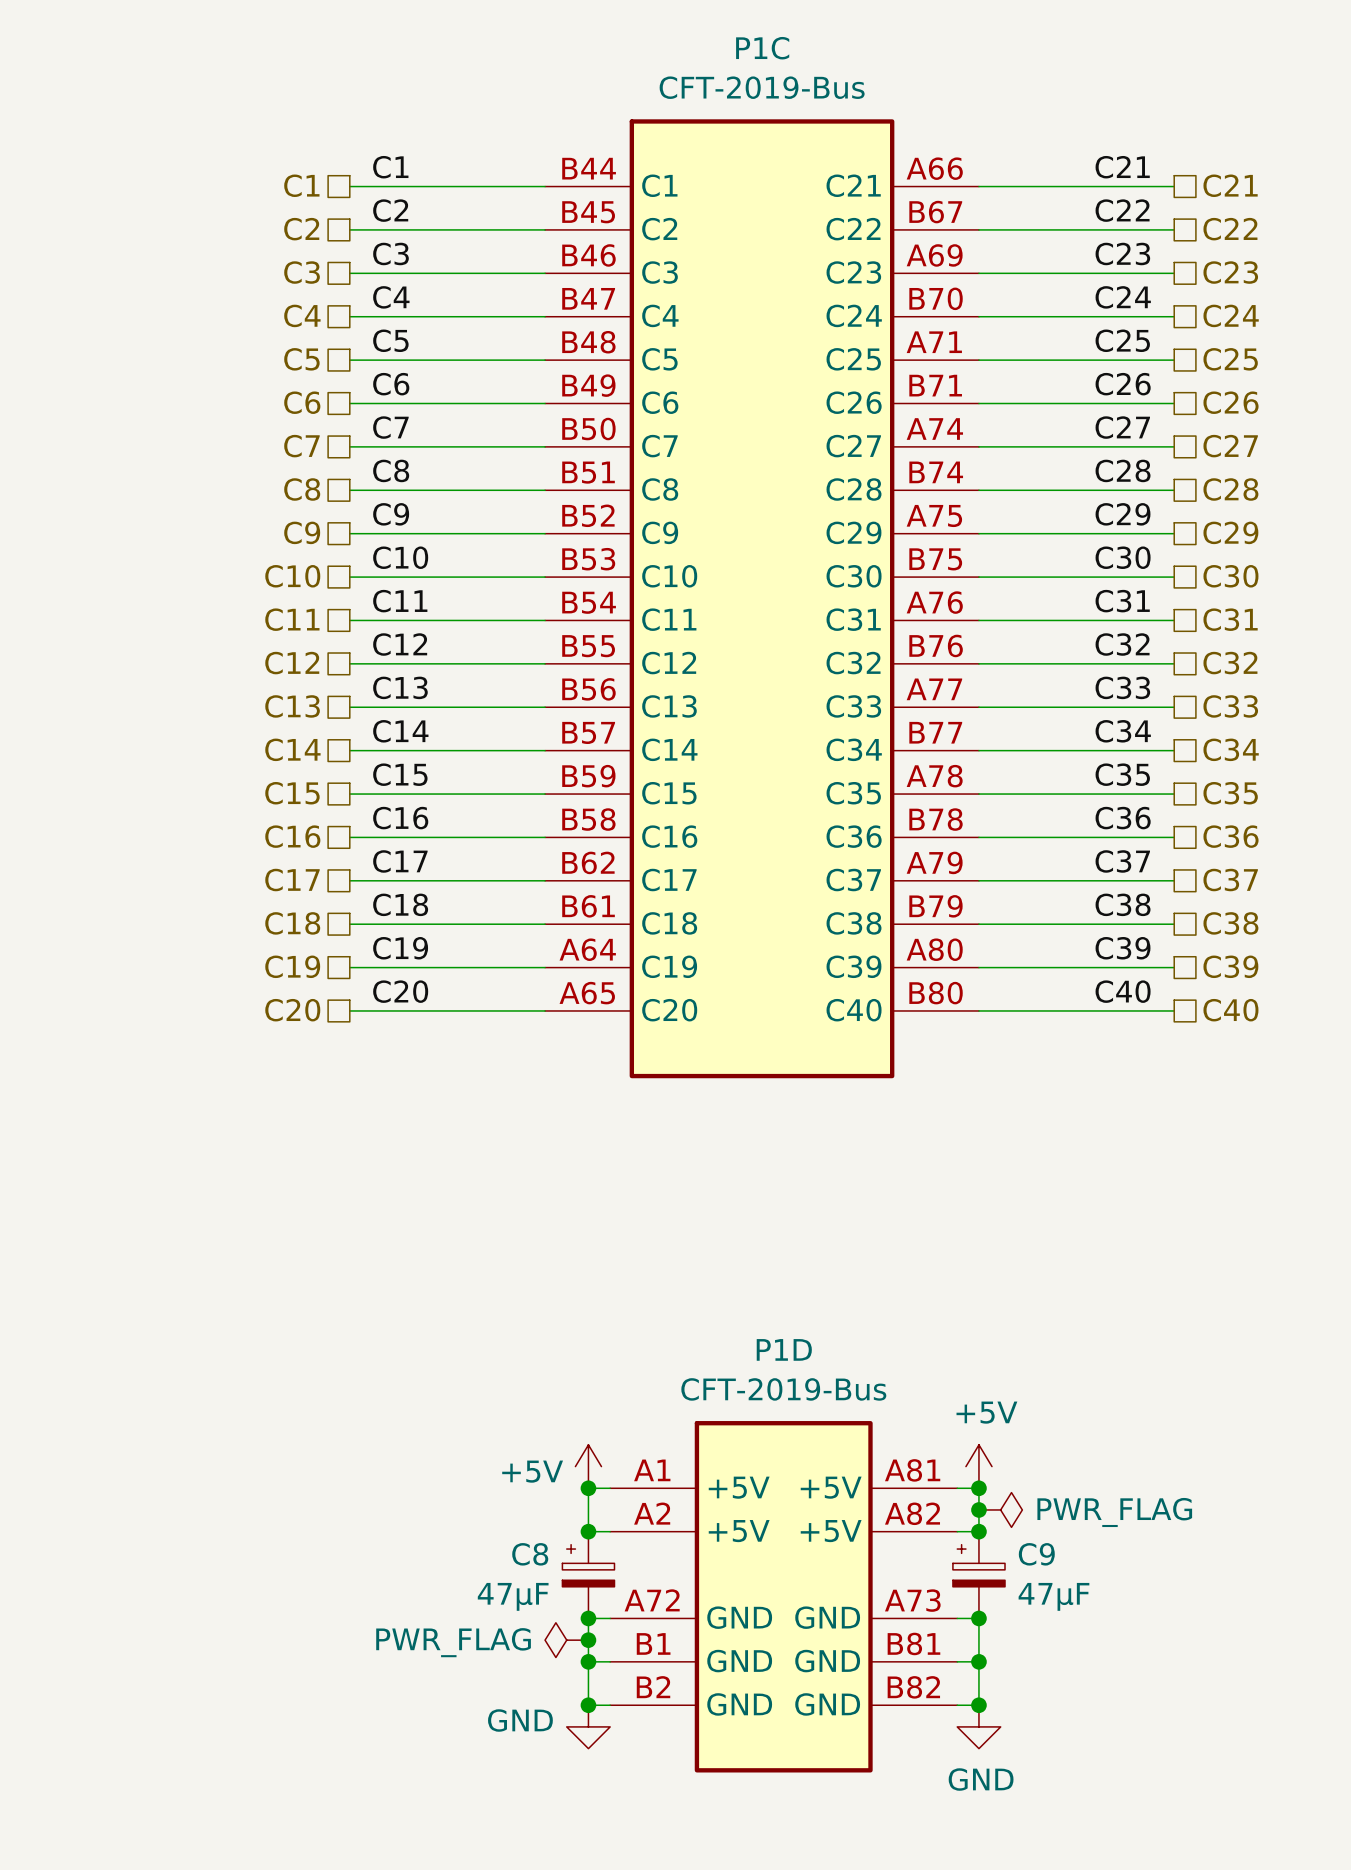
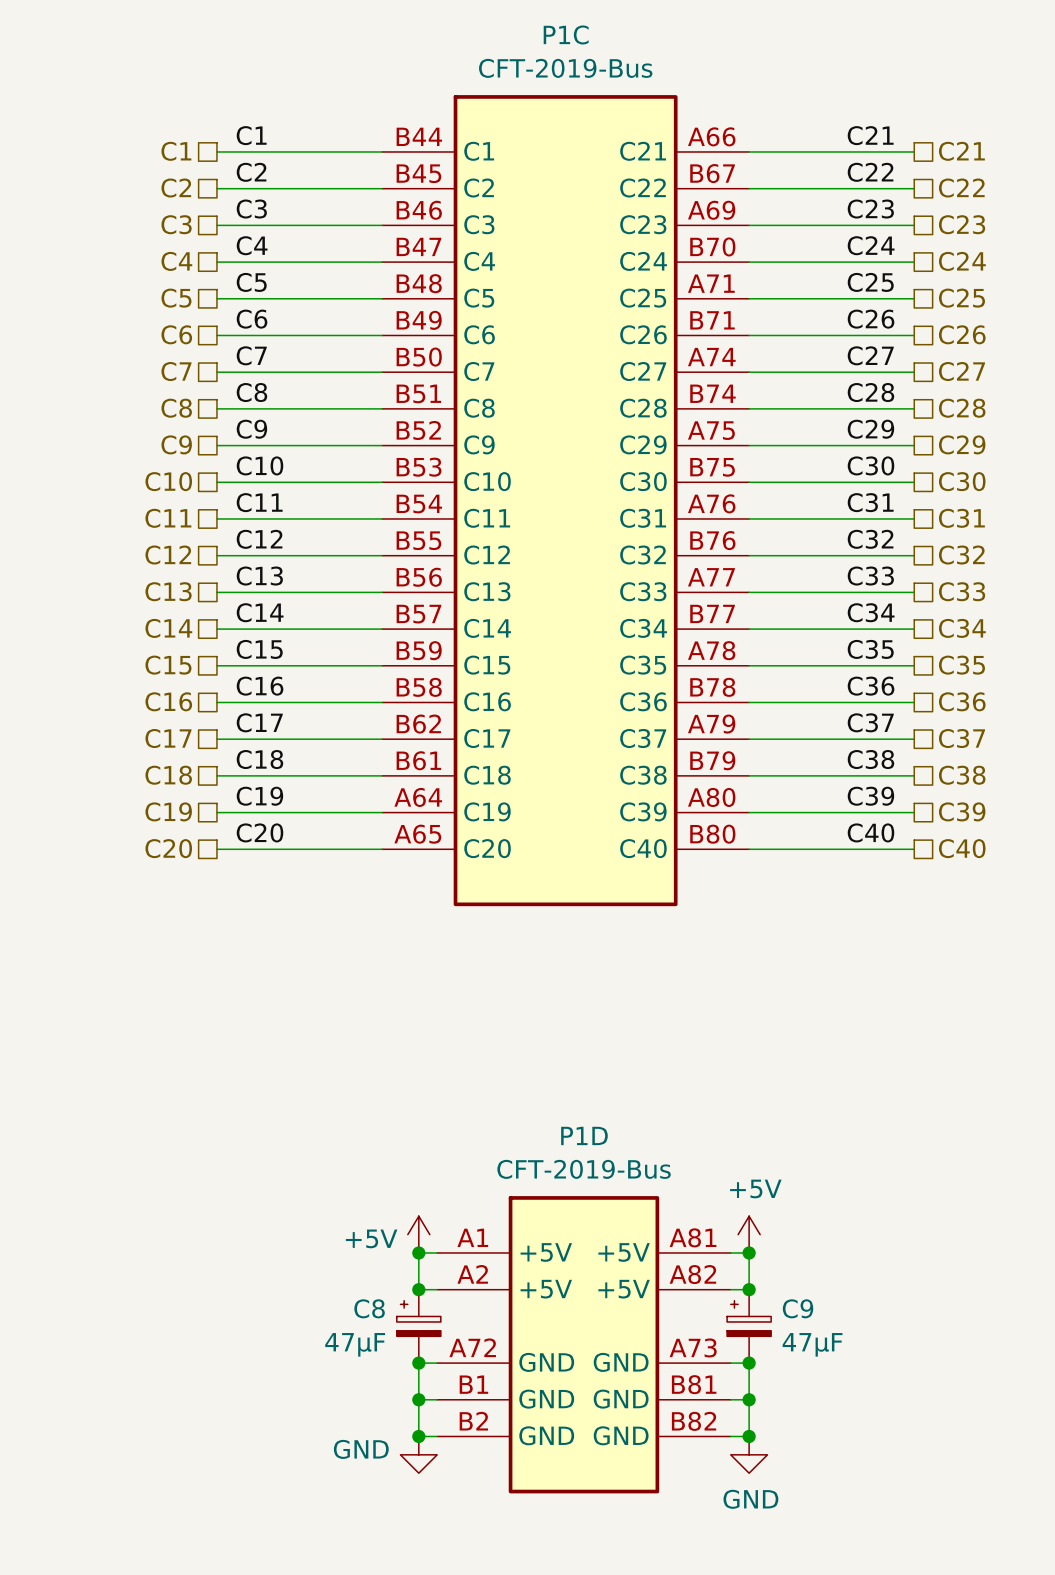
junction: (978, 1509) -> none
power symbol: PWR_FLAG (1000, 1509) -> none
power symbol: PWR_FLAG (566, 1640) -> none
junction: (588, 1640) -> none

